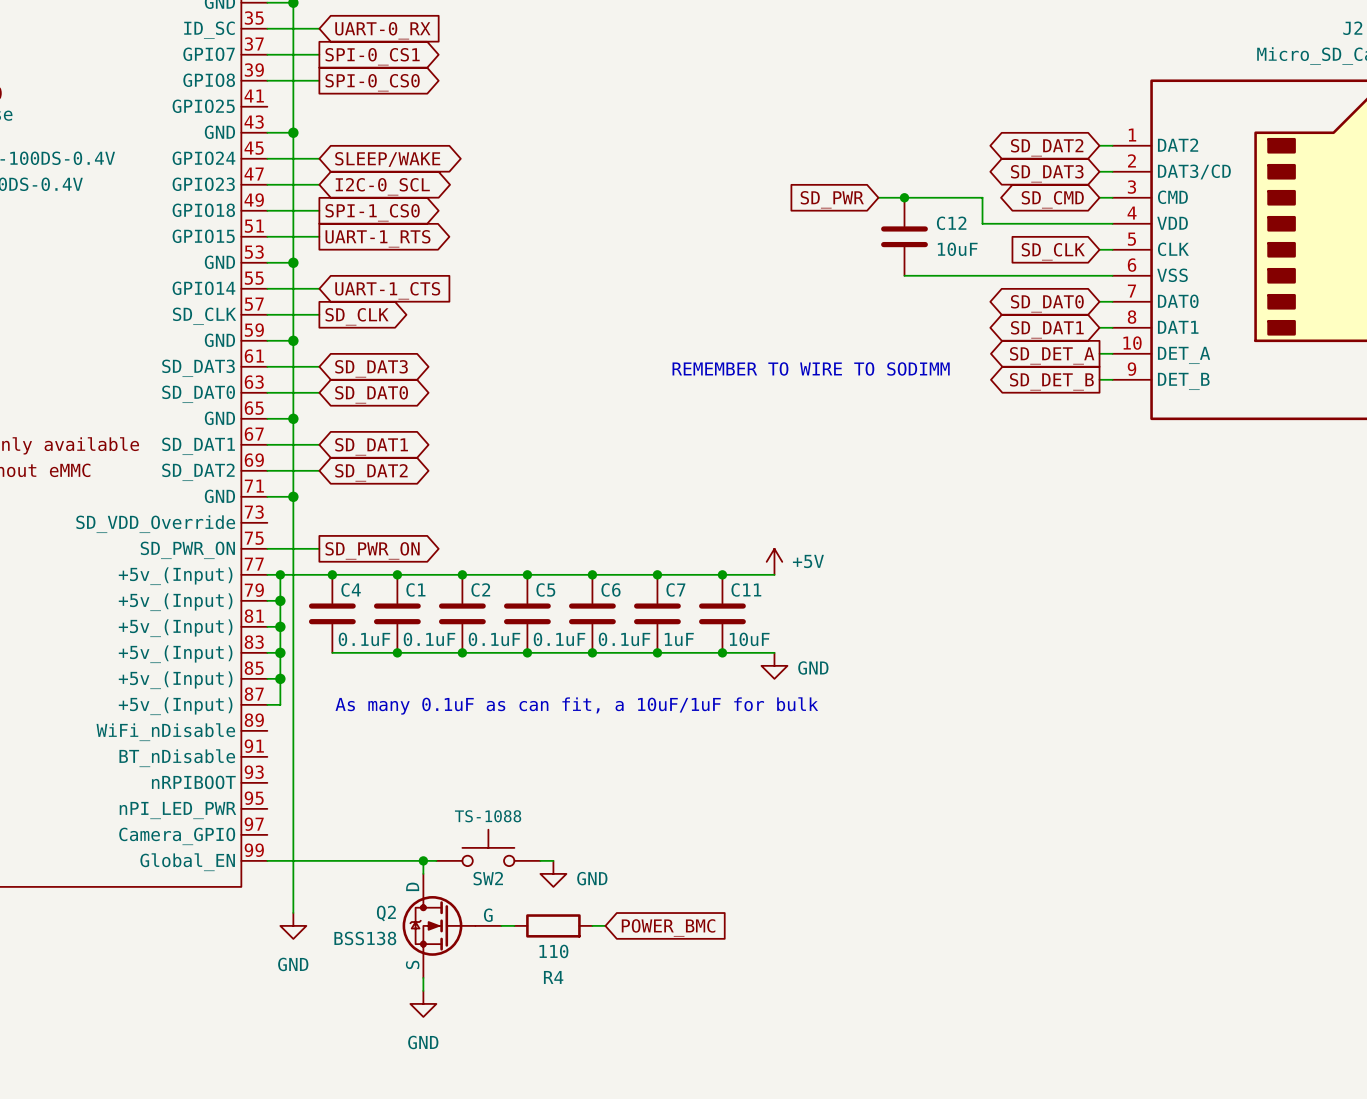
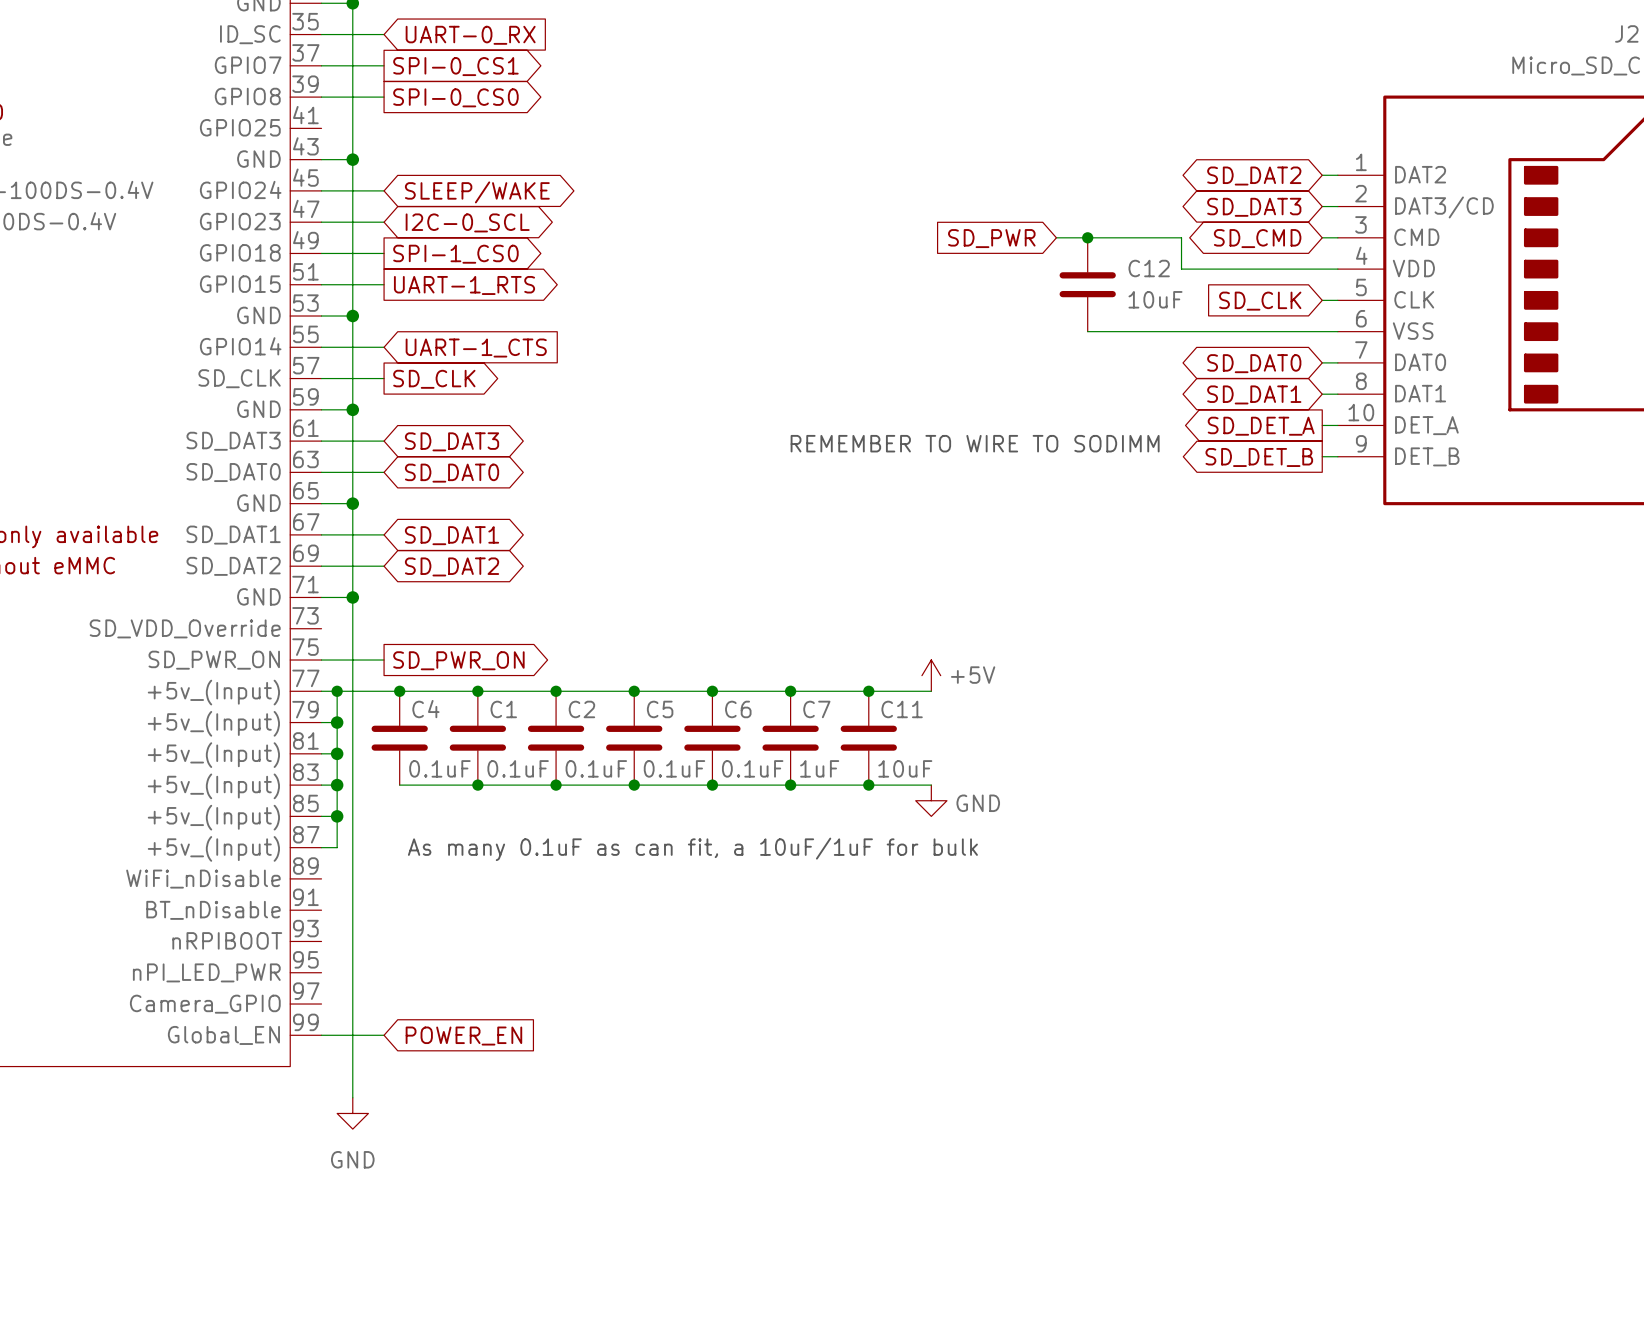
SW2: TS-1088 (488, 847) -> none
wire: (319, 860) (436, 860) -> none
wire: (423, 860) (423, 873) -> none
junction: (423, 860) -> none
wire: (540, 860) (553, 860) -> none
global label: none -> POWER_EN (463, 1036)
power symbol: GND (553, 873) -> none
Q2: BSS138 (451, 925) -> none
wire: (501, 925) (514, 925) -> none
R4: 110 (553, 925) -> none
wire: (592, 925) (605, 925) -> none
global label: POWER_BMC (668, 927) -> none
wire: (423, 977) (423, 990) -> none
power symbol: GND (423, 1003) -> none

